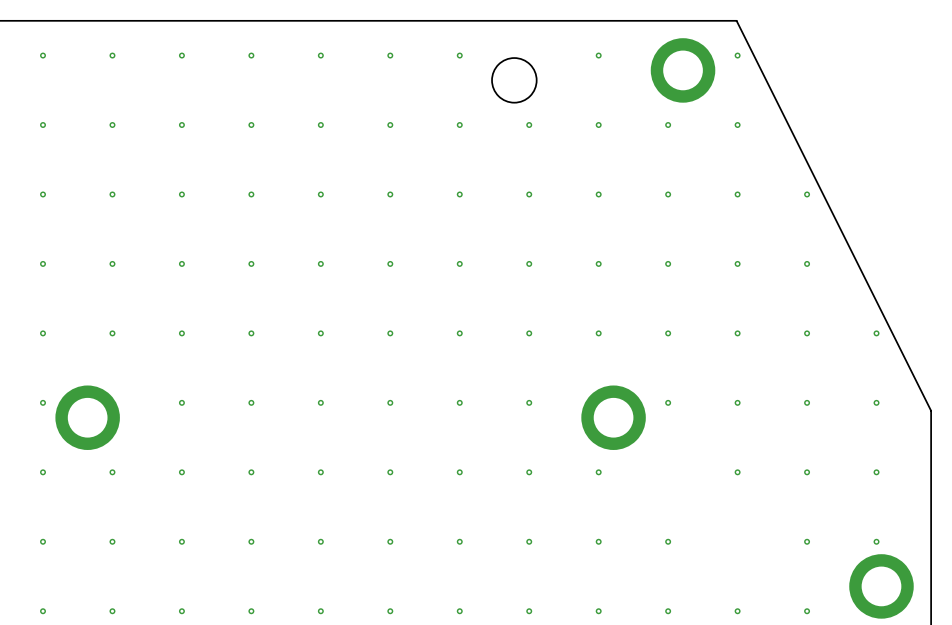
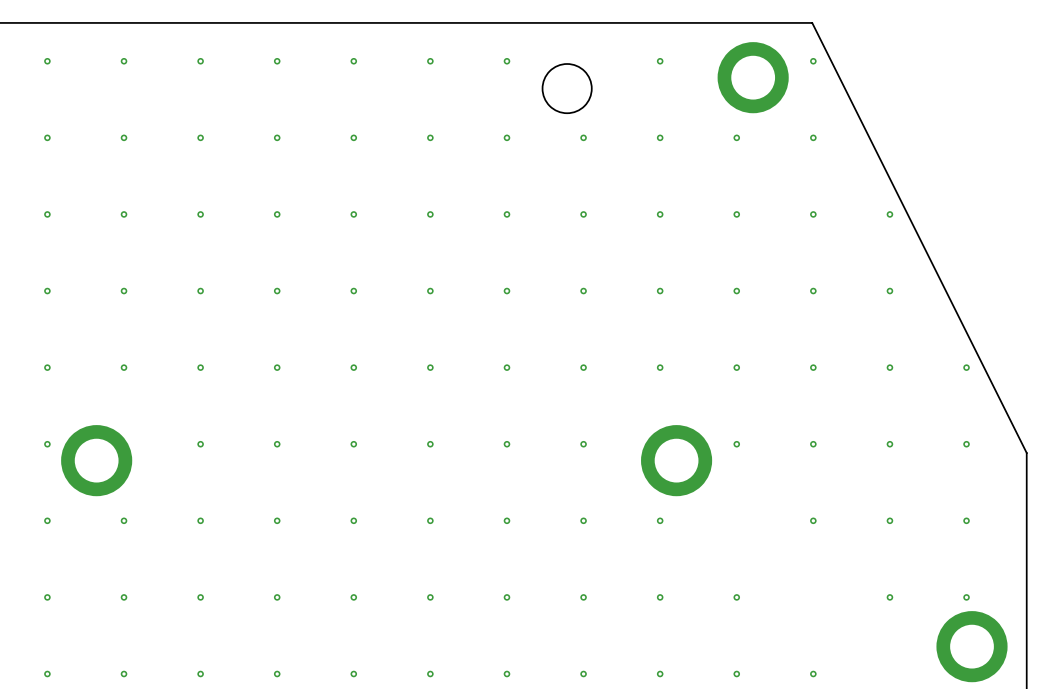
via: (807, 611) -> none

